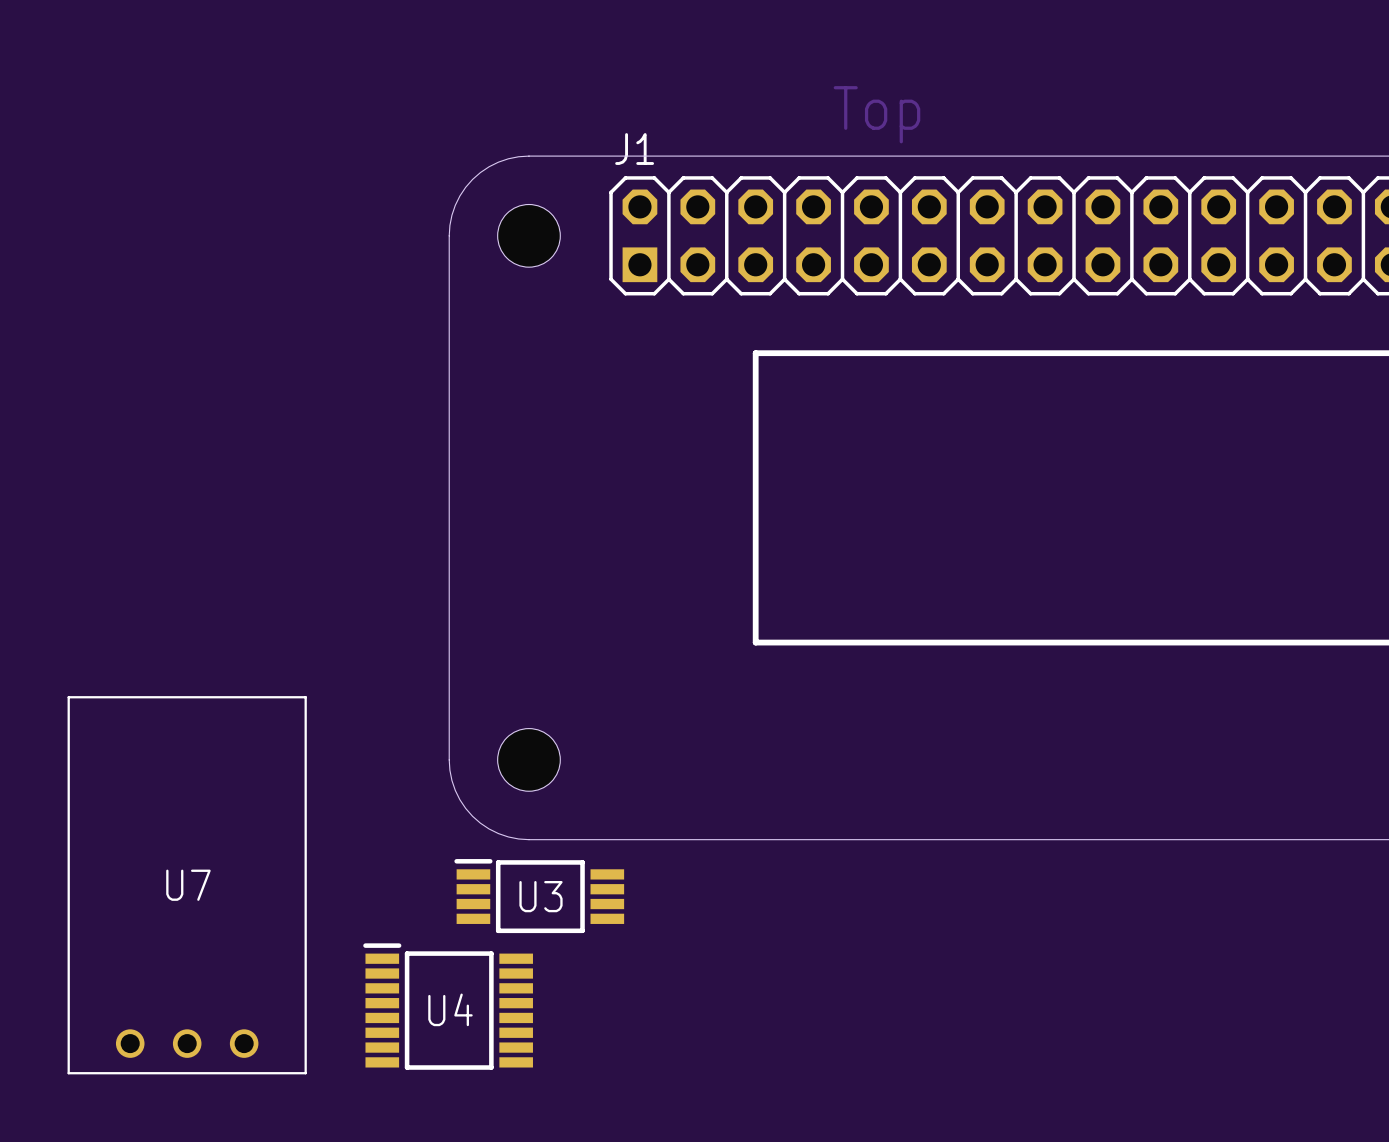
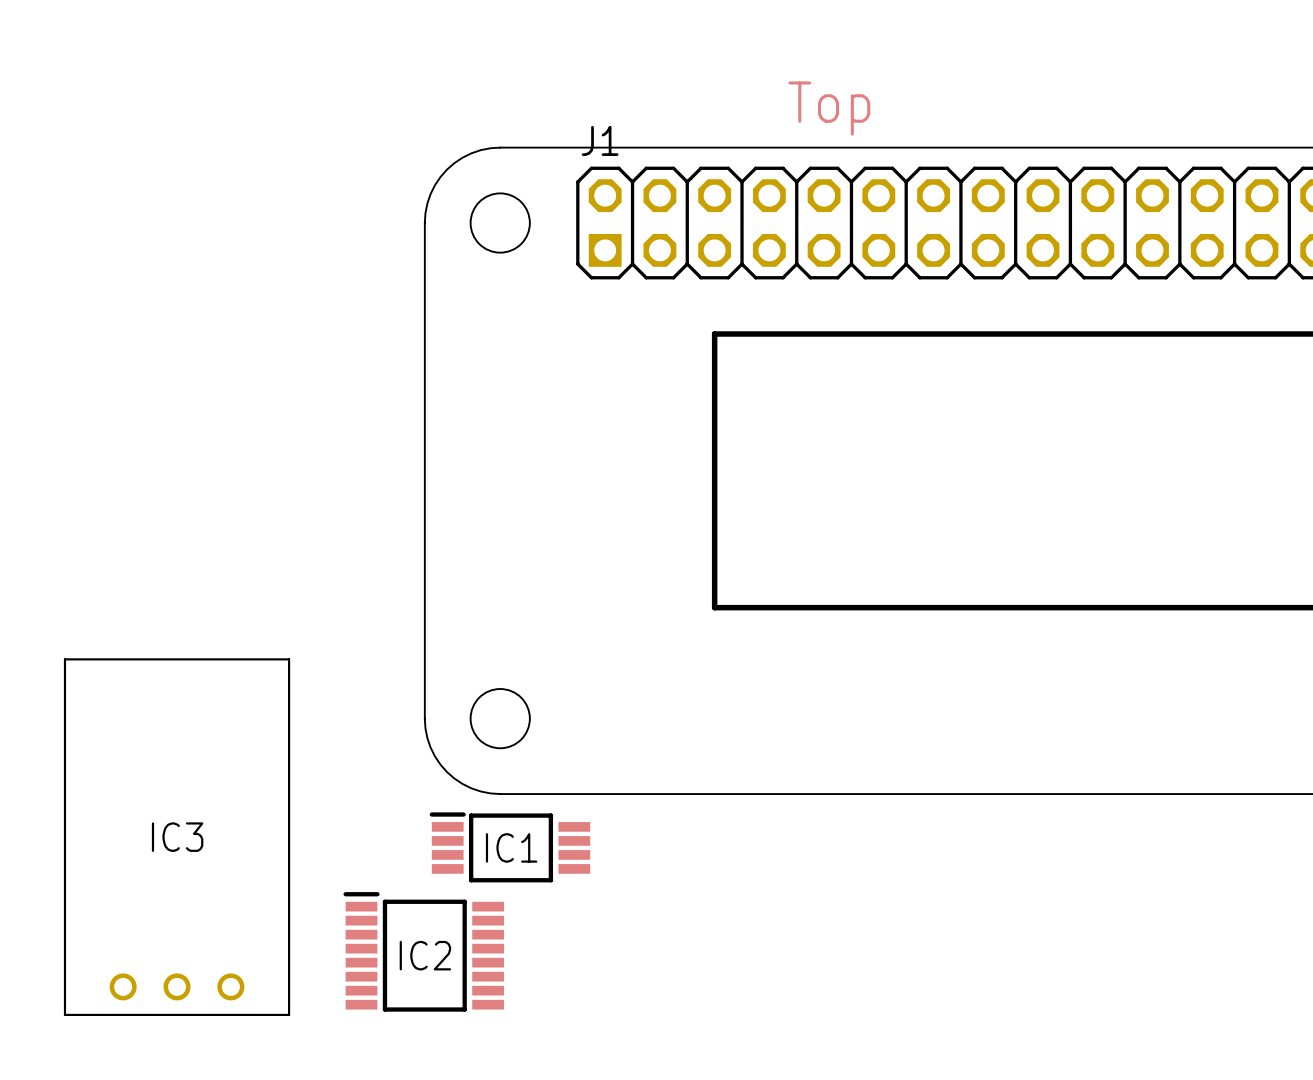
U7 name: U7 (188, 885) -> IC3 (177, 837)
U3 name: U3 (540, 896) -> IC1 (511, 847)
U4 name: U4 (450, 1009) -> IC2 (425, 955)

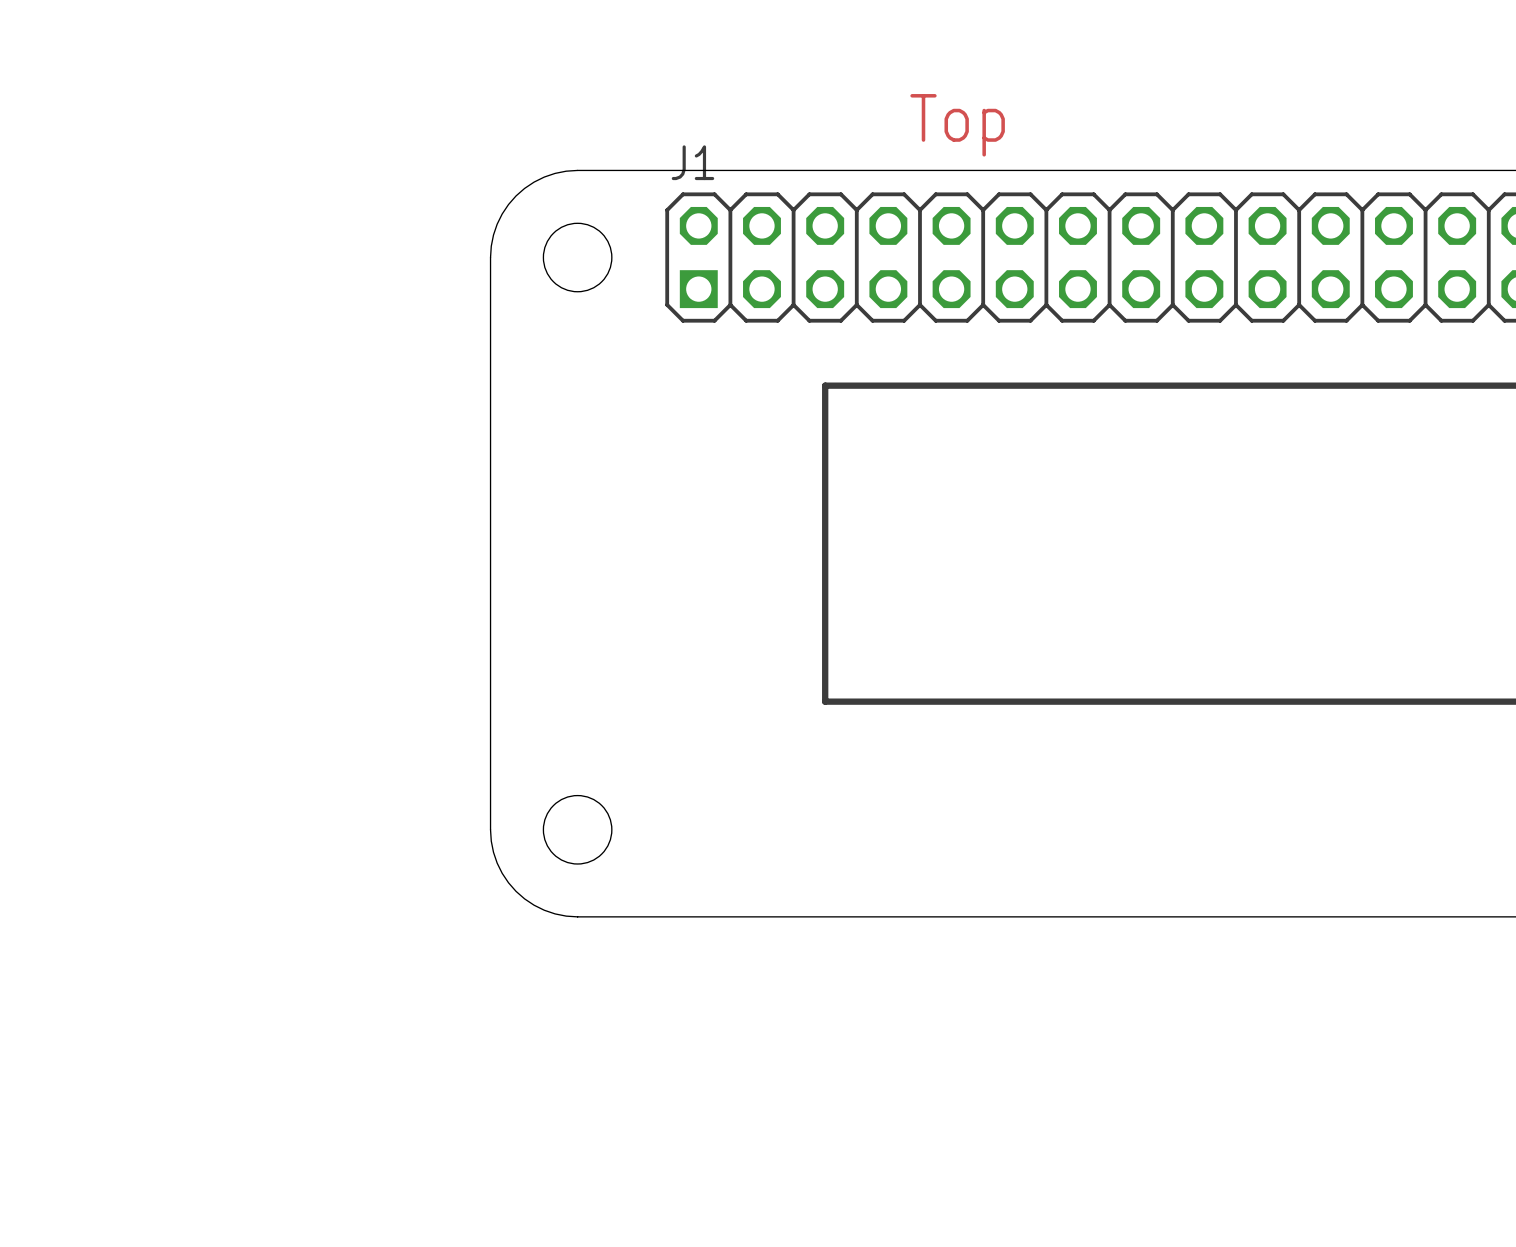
IC3: (177, 837) -> none
IC1: (509, 847) -> none
IC2: (423, 951) -> none

